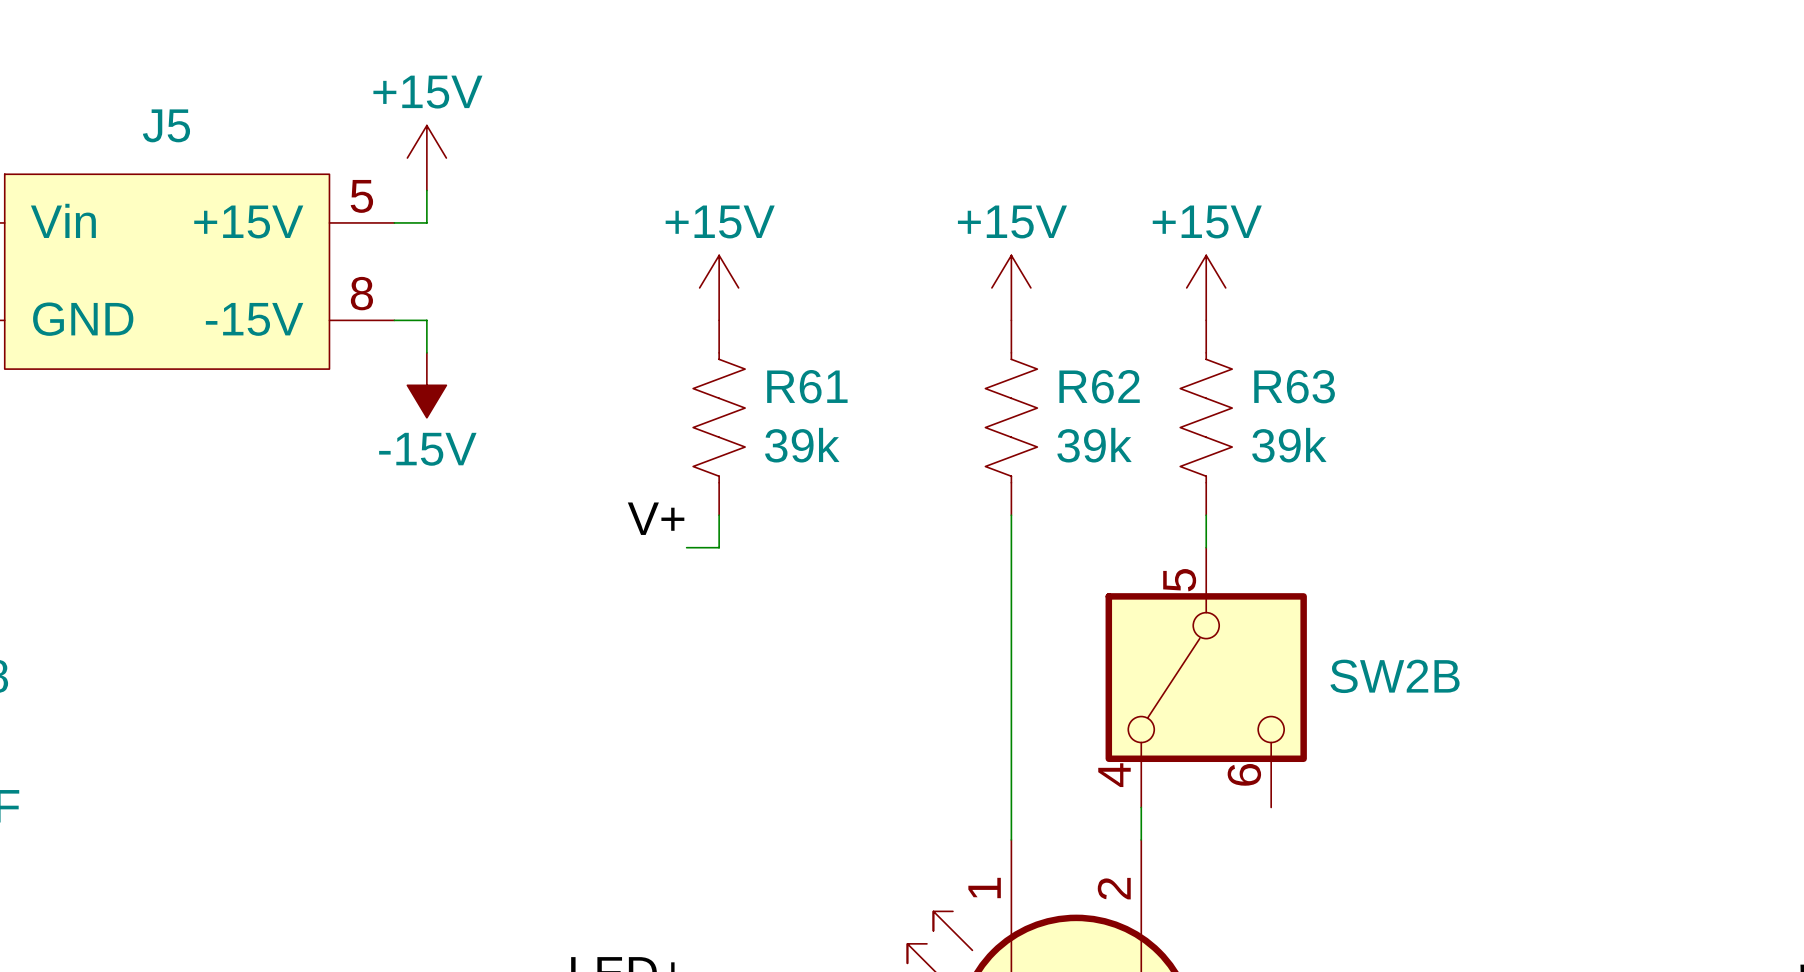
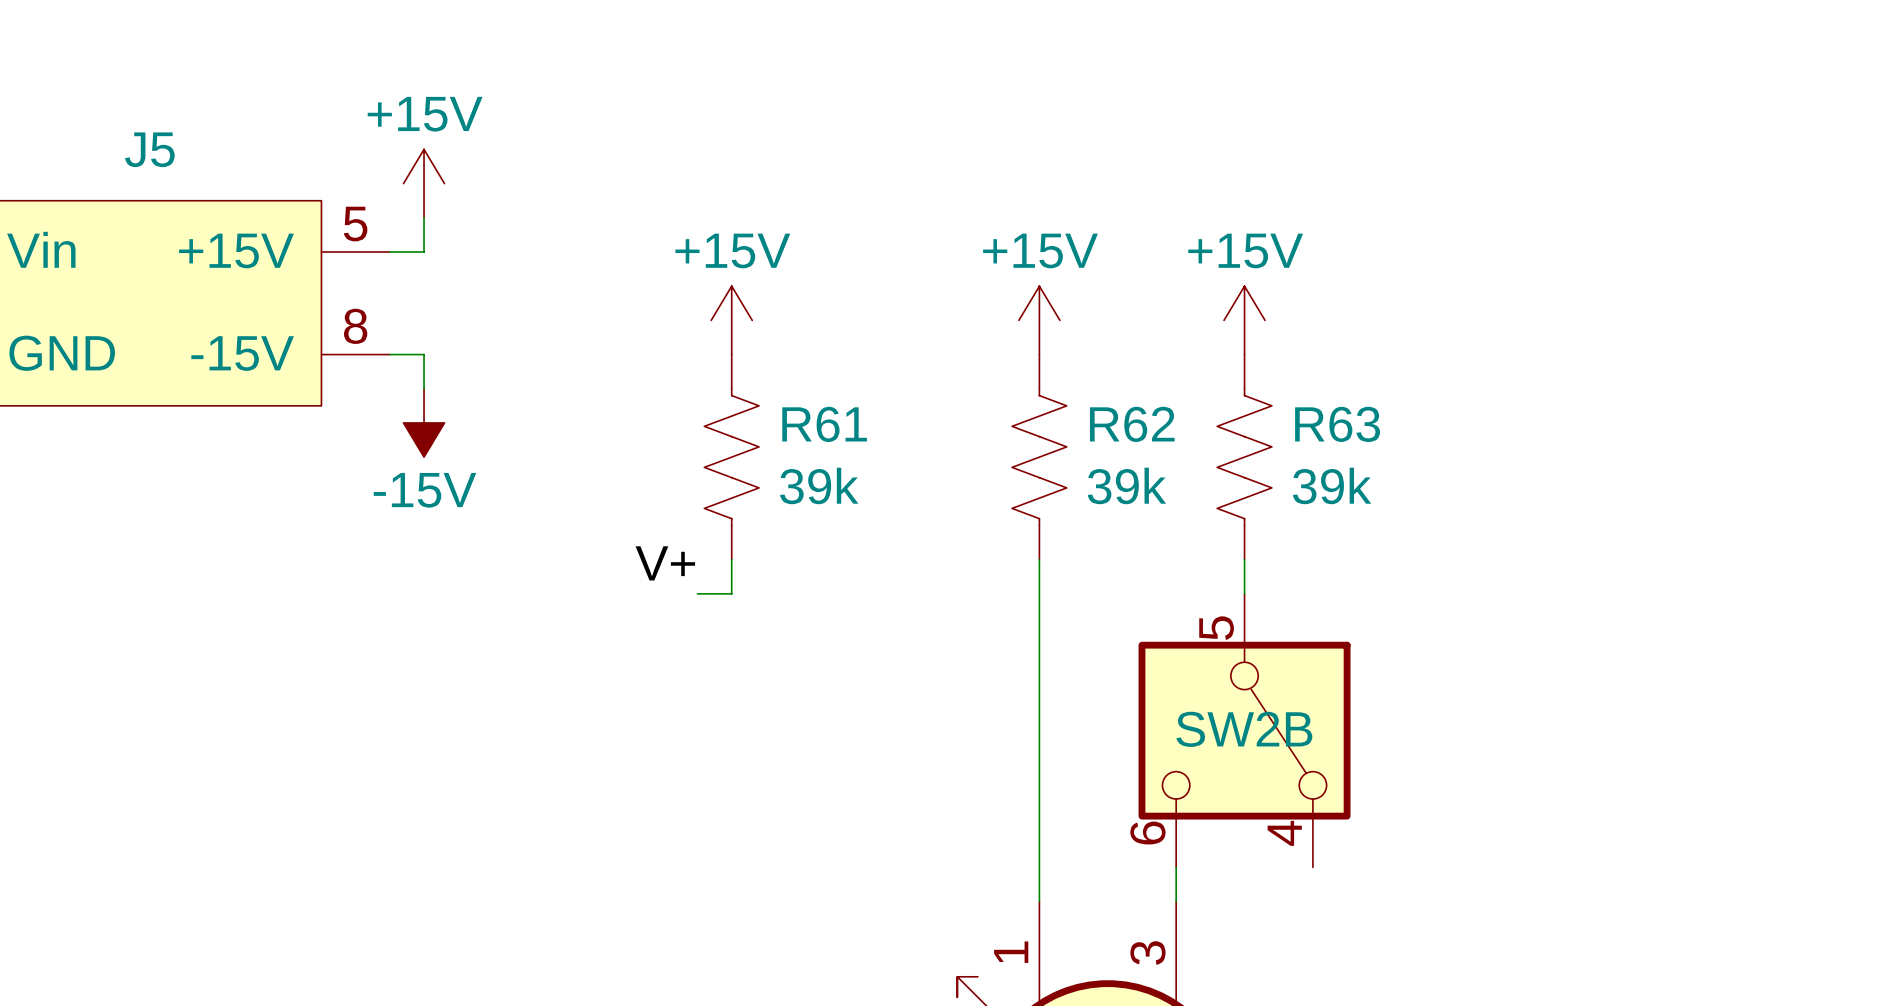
SW2B name position: SW2B (1395, 676) -> SW2B (1244, 729)
SW2B flip: as is (1206, 677) -> left-right (1244, 730)
part pin number: 2 (1114, 888) -> 3 (1147, 953)

